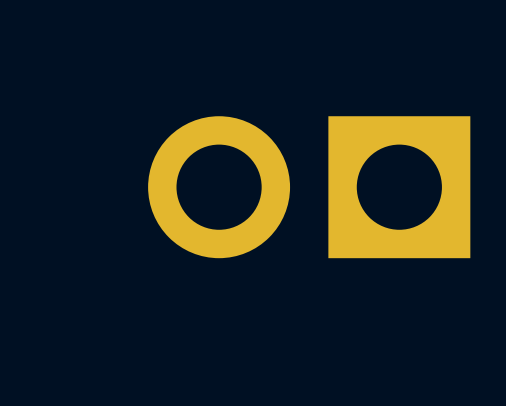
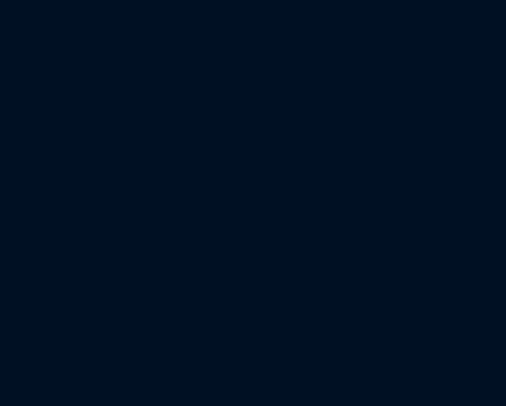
part: (309, 187) -> none

